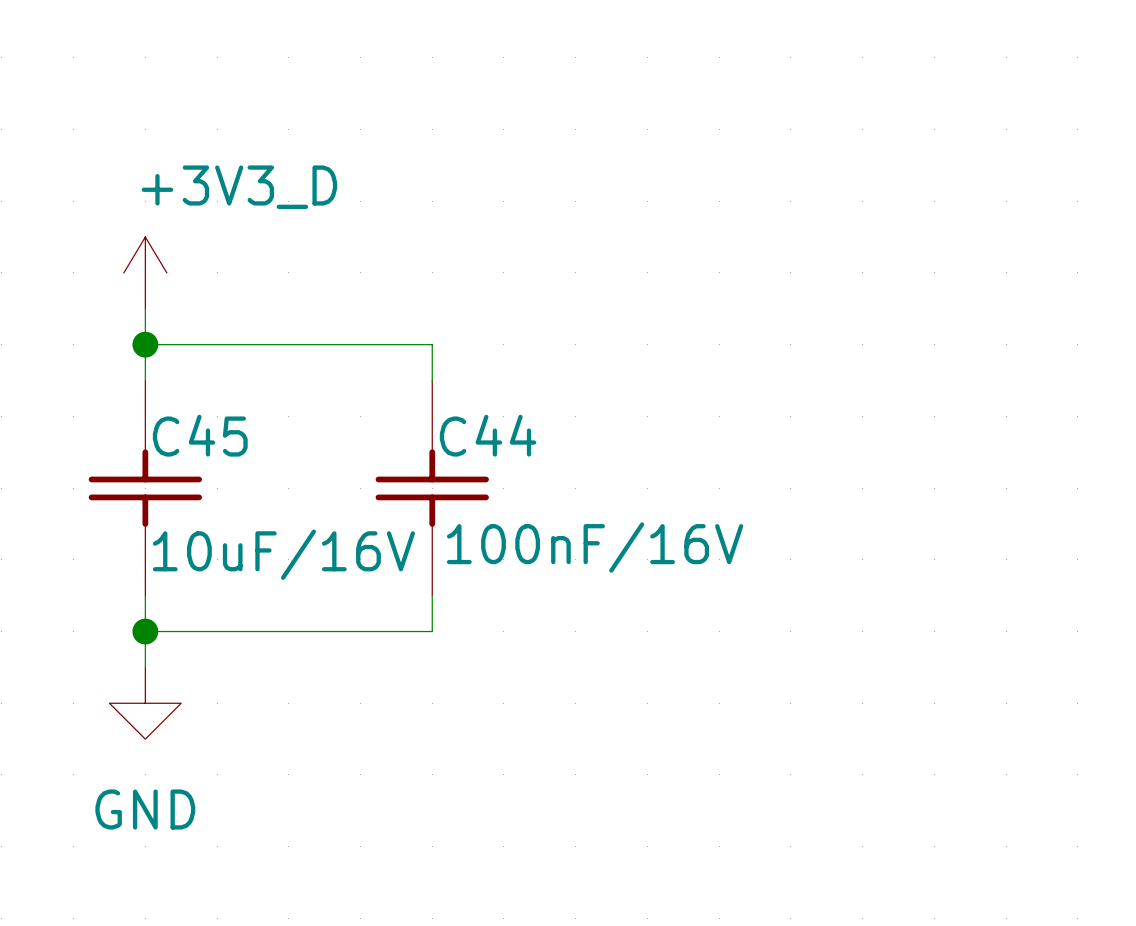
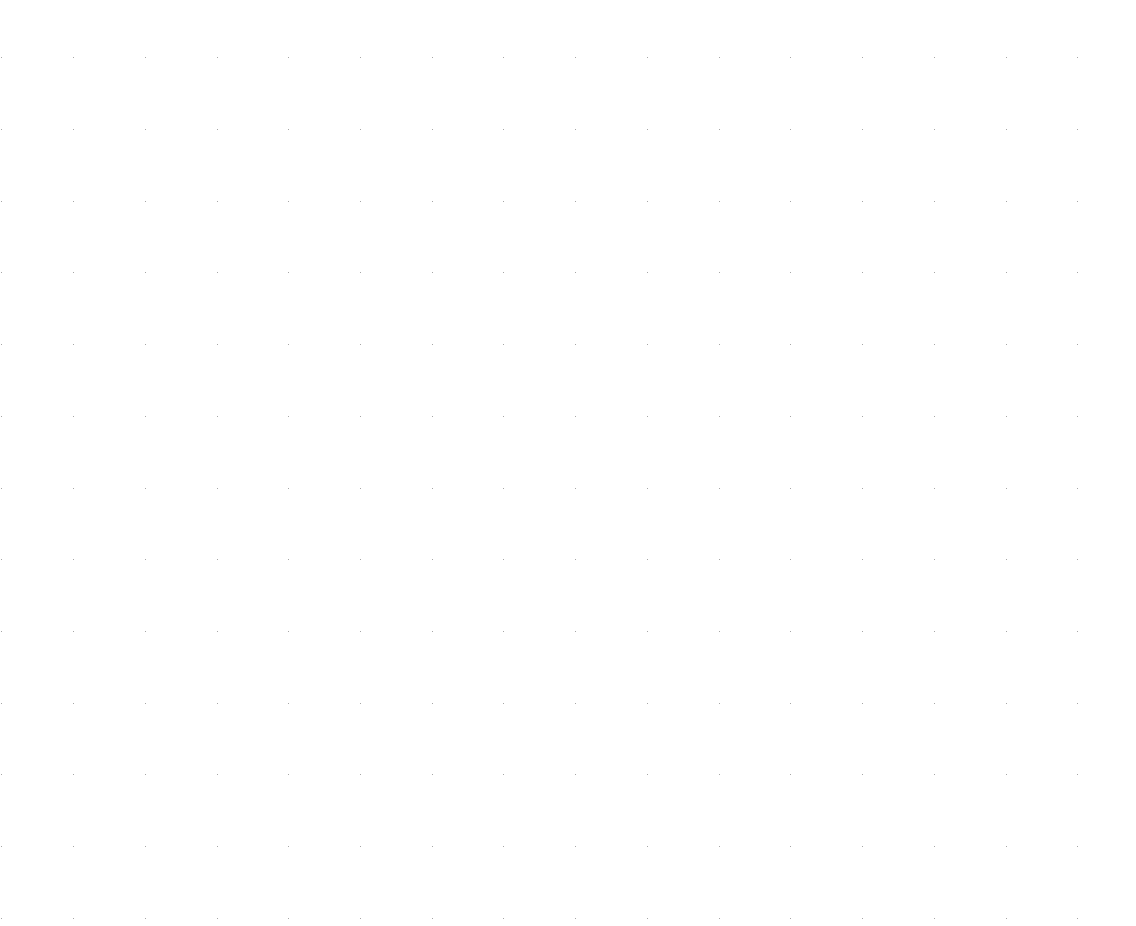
power symbol: +3V3_D (145, 272) -> none
wire: (145, 308) (145, 380) -> none
wire: (145, 344) (432, 344) (432, 380) -> none
junction: (145, 344) -> none
C45: 10uF/16V (145, 488) -> none
C44: 100nF/16V (432, 488) -> none
wire: (145, 595) (145, 667) -> none
wire: (432, 595) (432, 631) (145, 631) -> none
junction: (145, 631) -> none
power symbol: GND (145, 703) -> none

